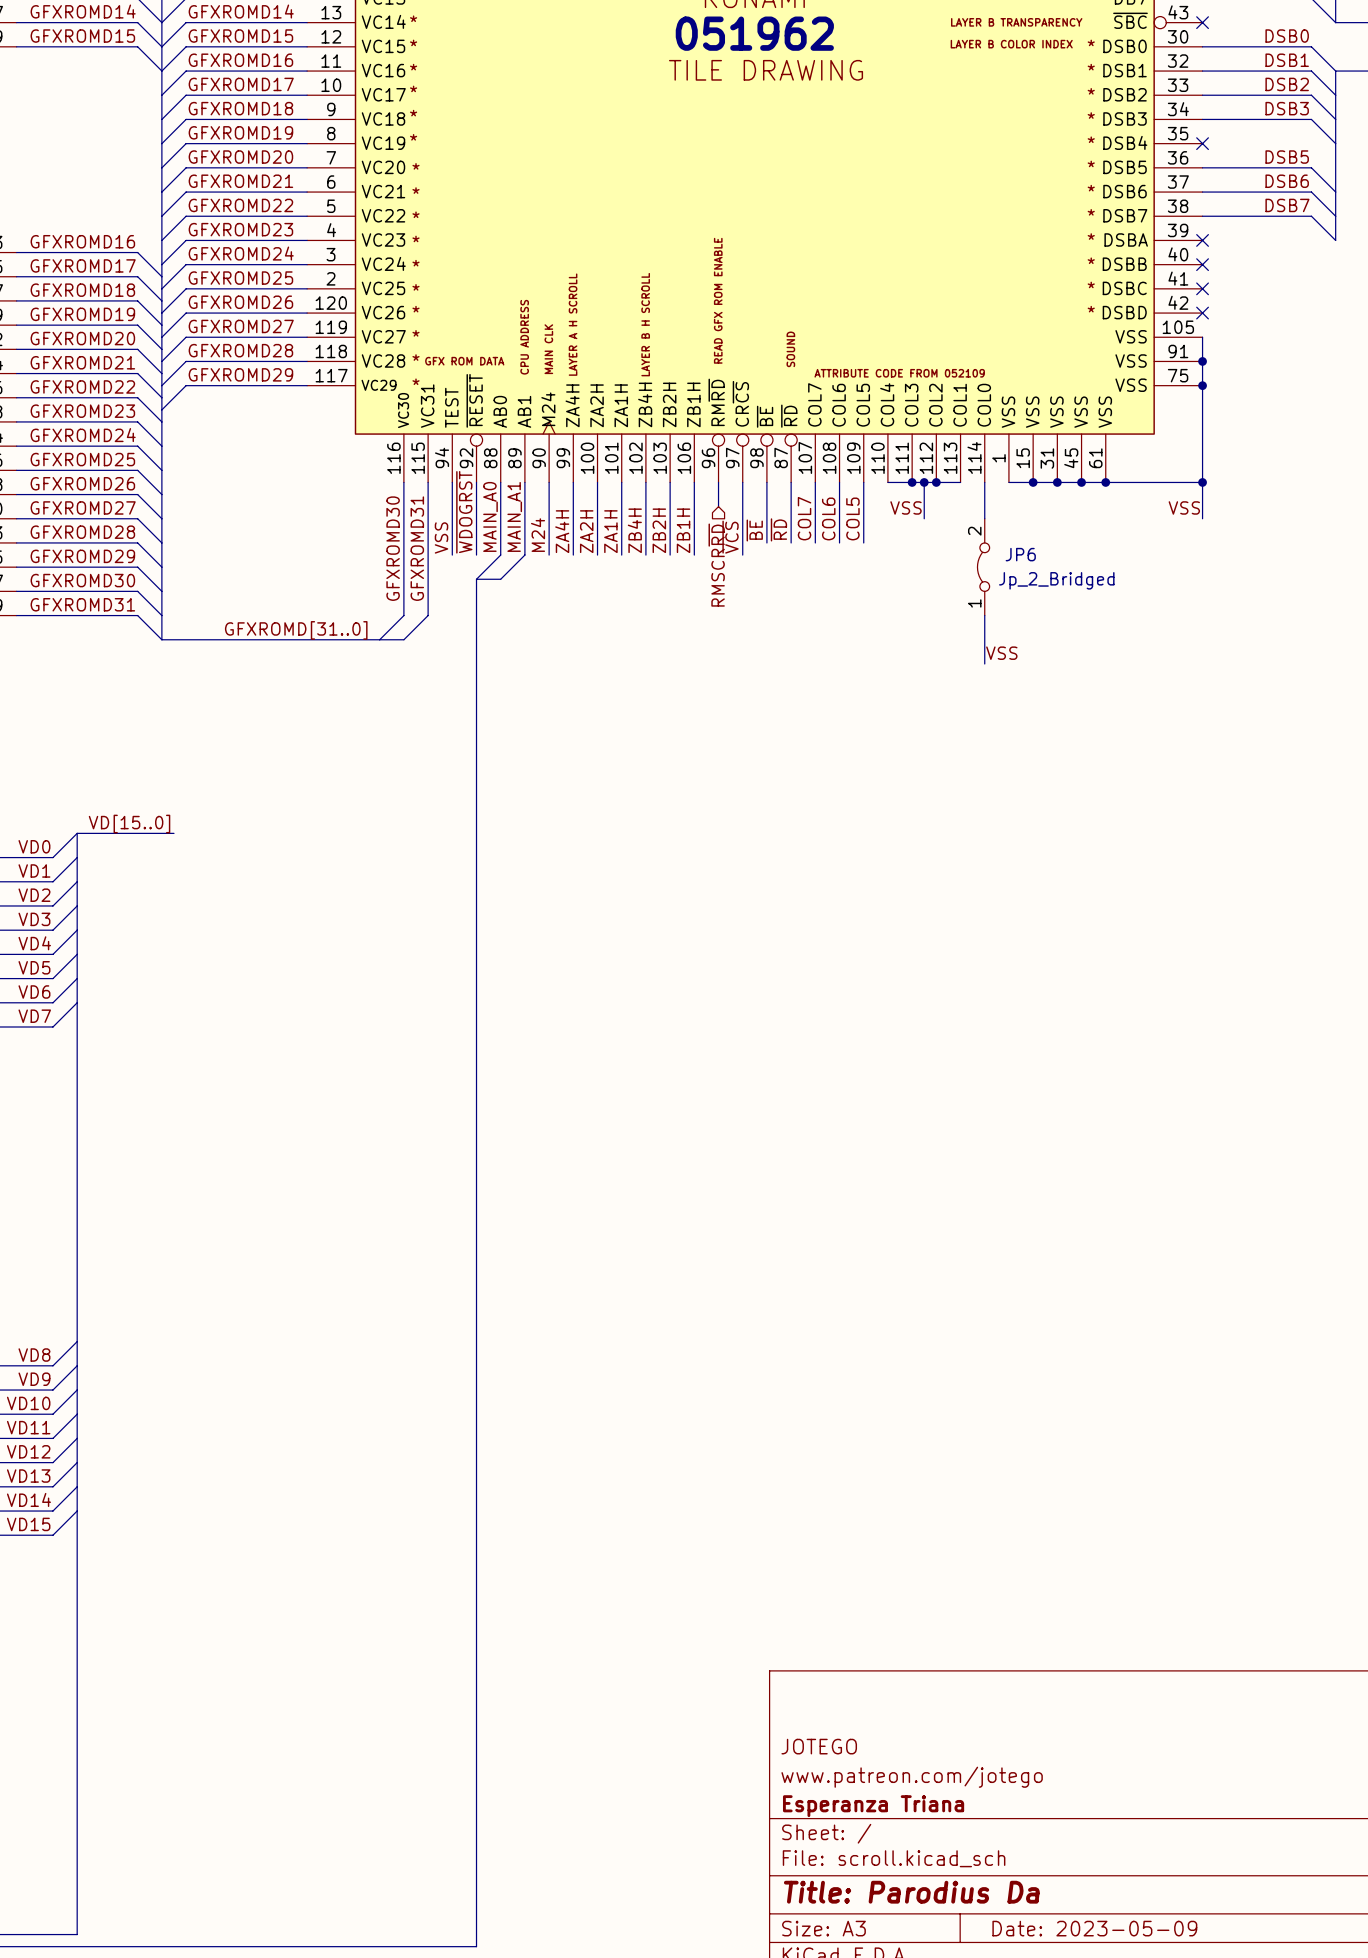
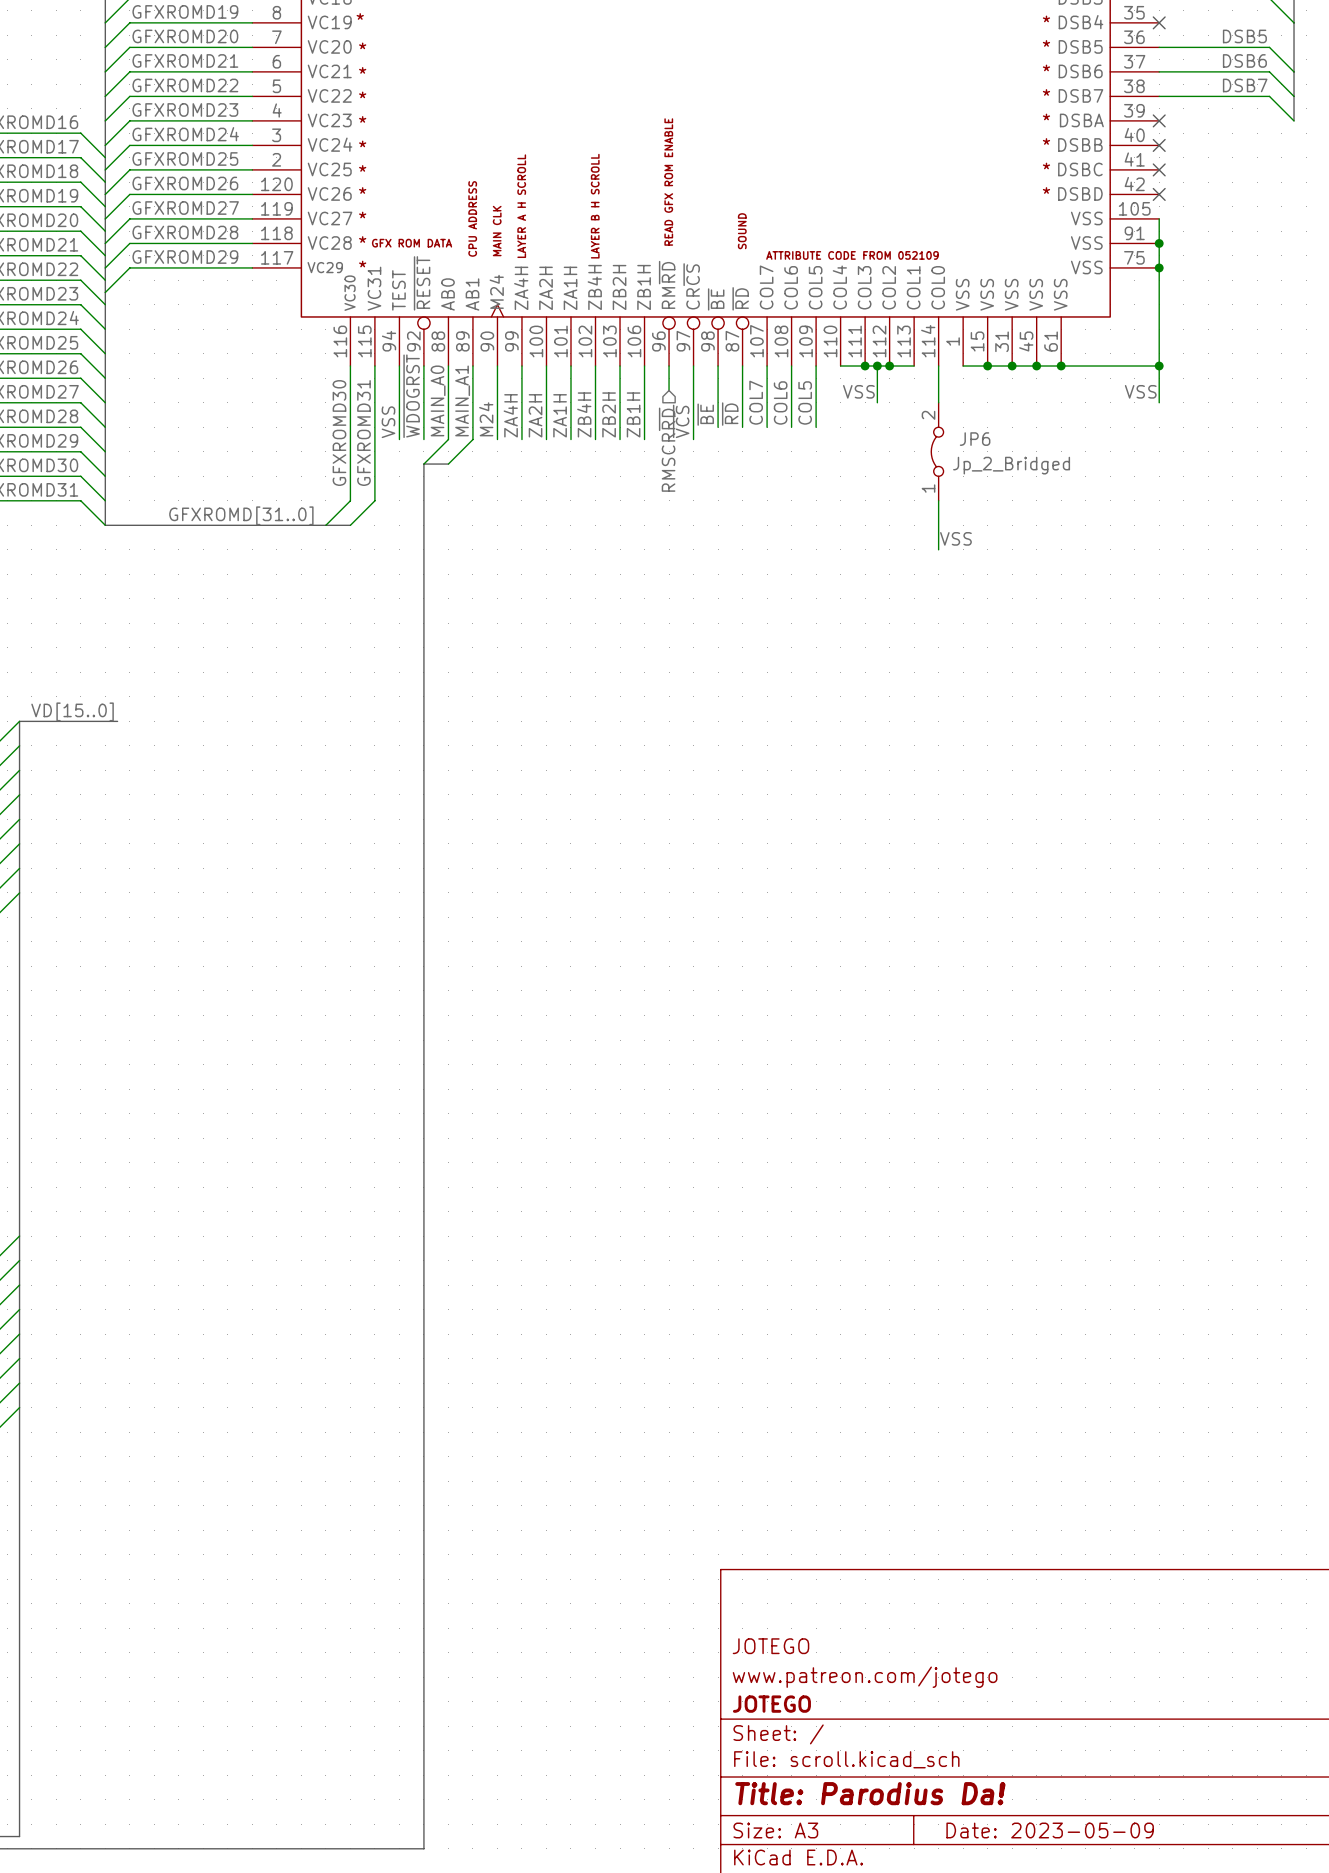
title block: Esperanza Triana (873, 1806) -> JOTEGO (771, 1704)
title block: Title: Parodius Da (911, 1892) -> Title: Parodius Da! (870, 1793)

